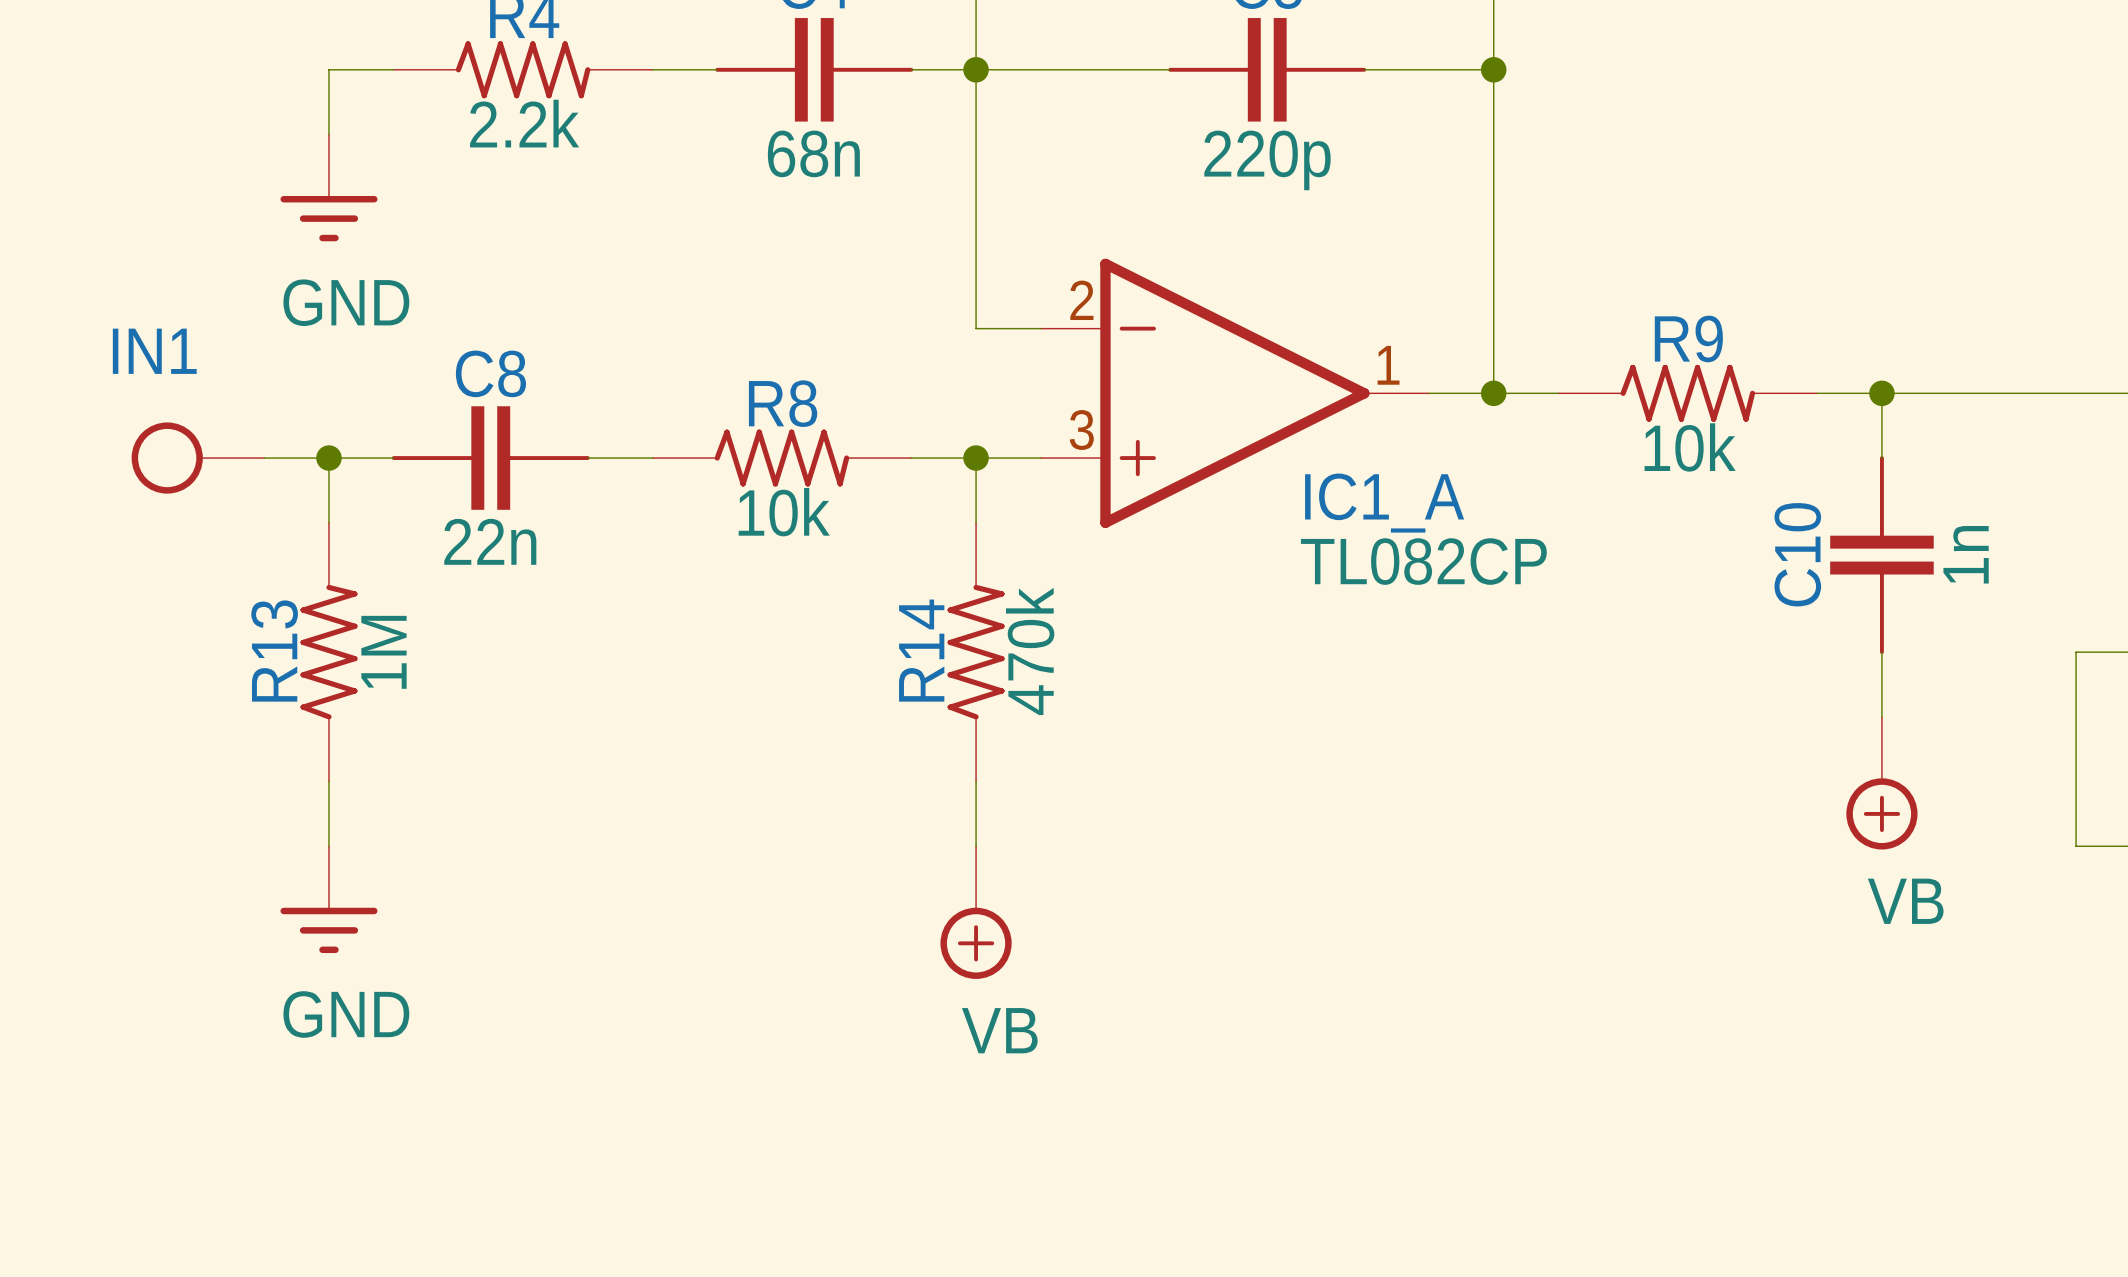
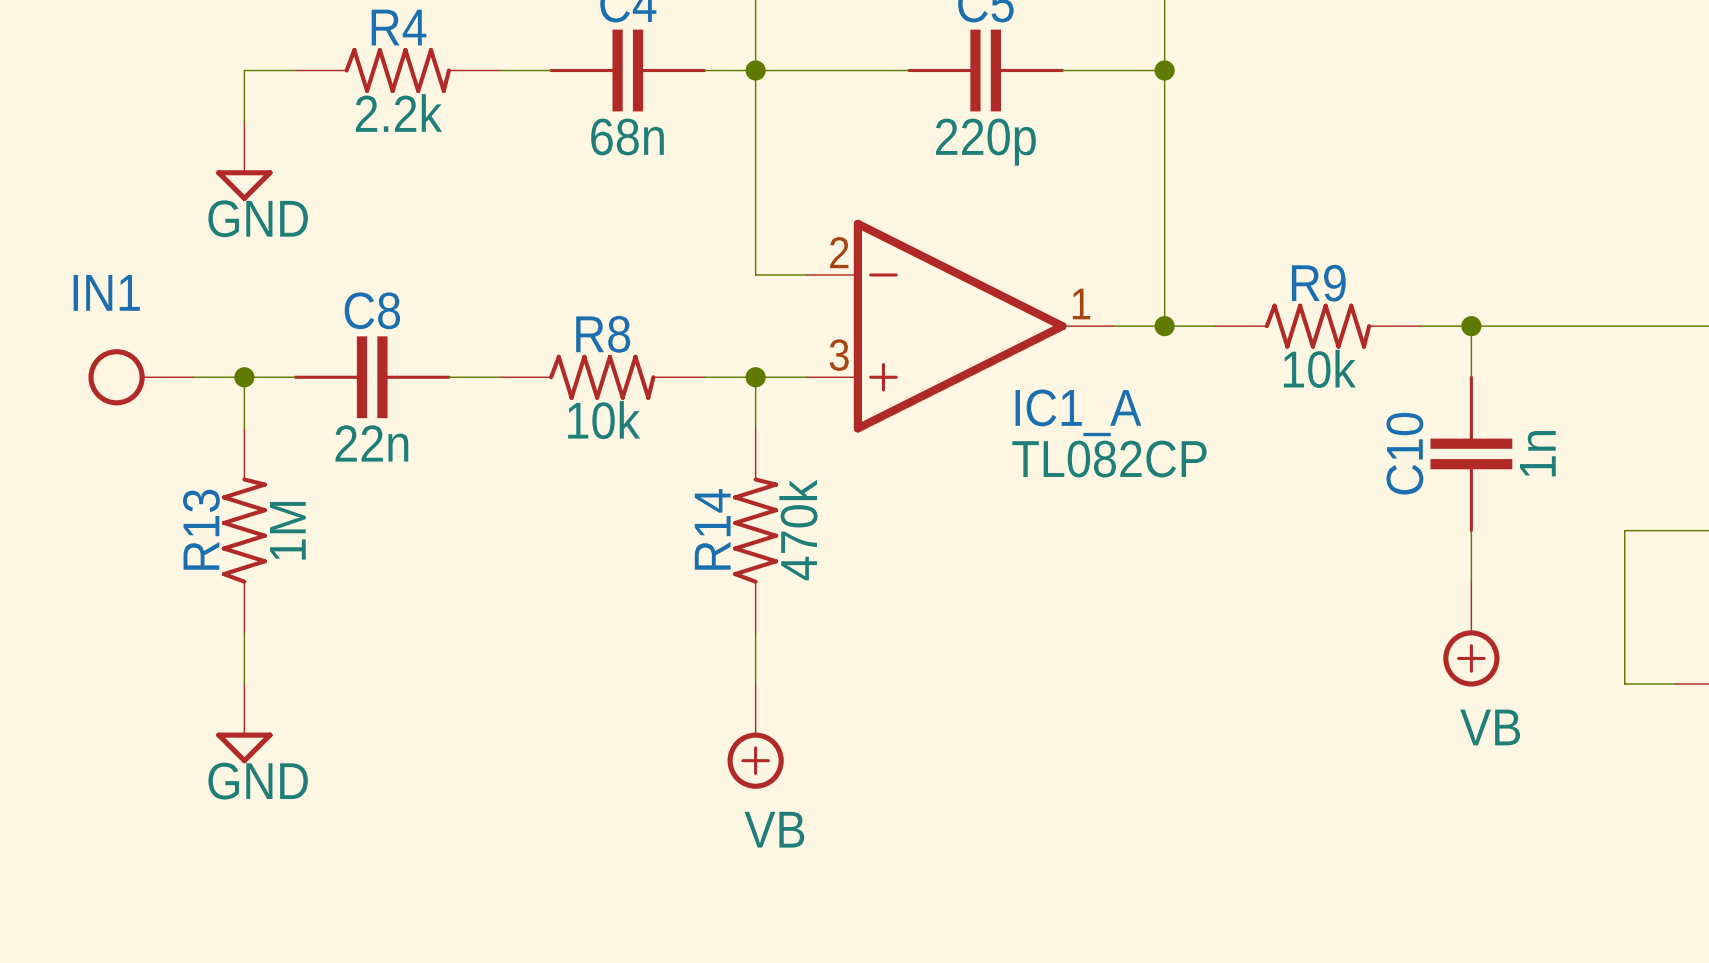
power symbol shape: [280, 134, 378, 242] -> [216, 121, 273, 201]
power symbol text position: GND (346, 302) -> GND (258, 218)
power symbol shape: [280, 846, 378, 954] -> [216, 684, 273, 764]
power symbol text position: GND (346, 1014) -> GND (258, 781)

